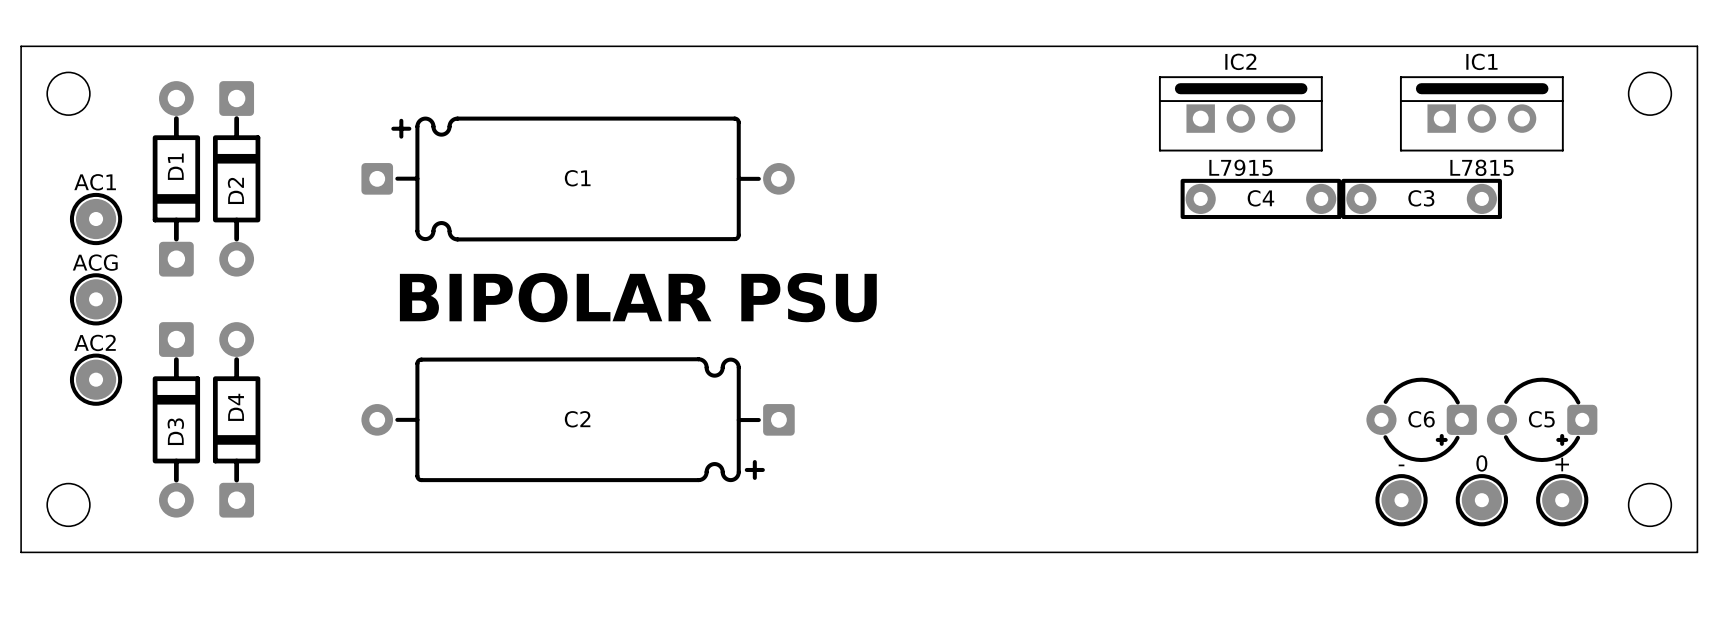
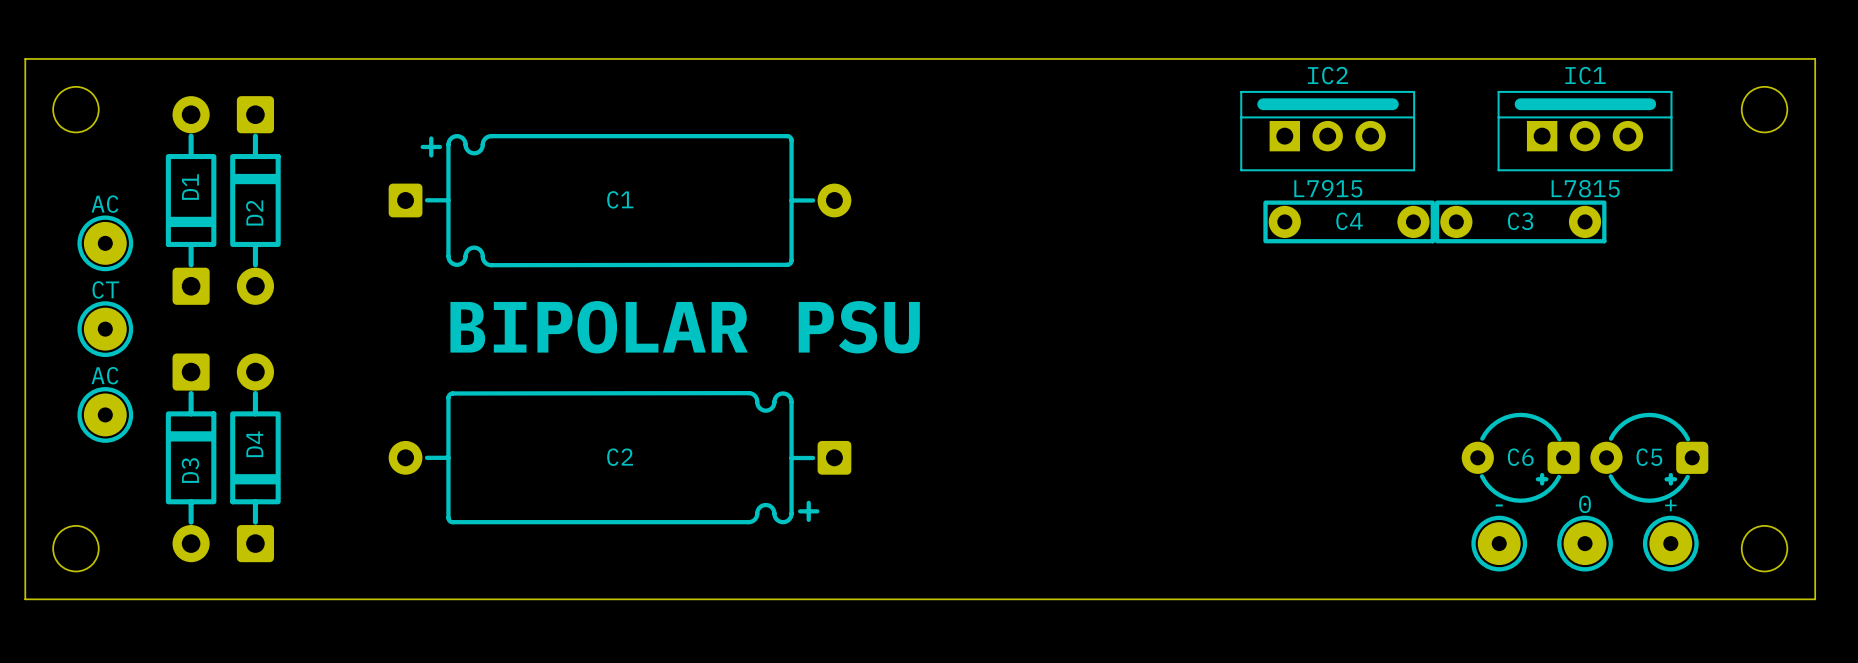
part value: AC1 (95, 182) -> AC (104, 204)
part value: ACG (95, 262) -> CT (105, 289)
part value: AC2 (95, 342) -> AC (104, 375)

